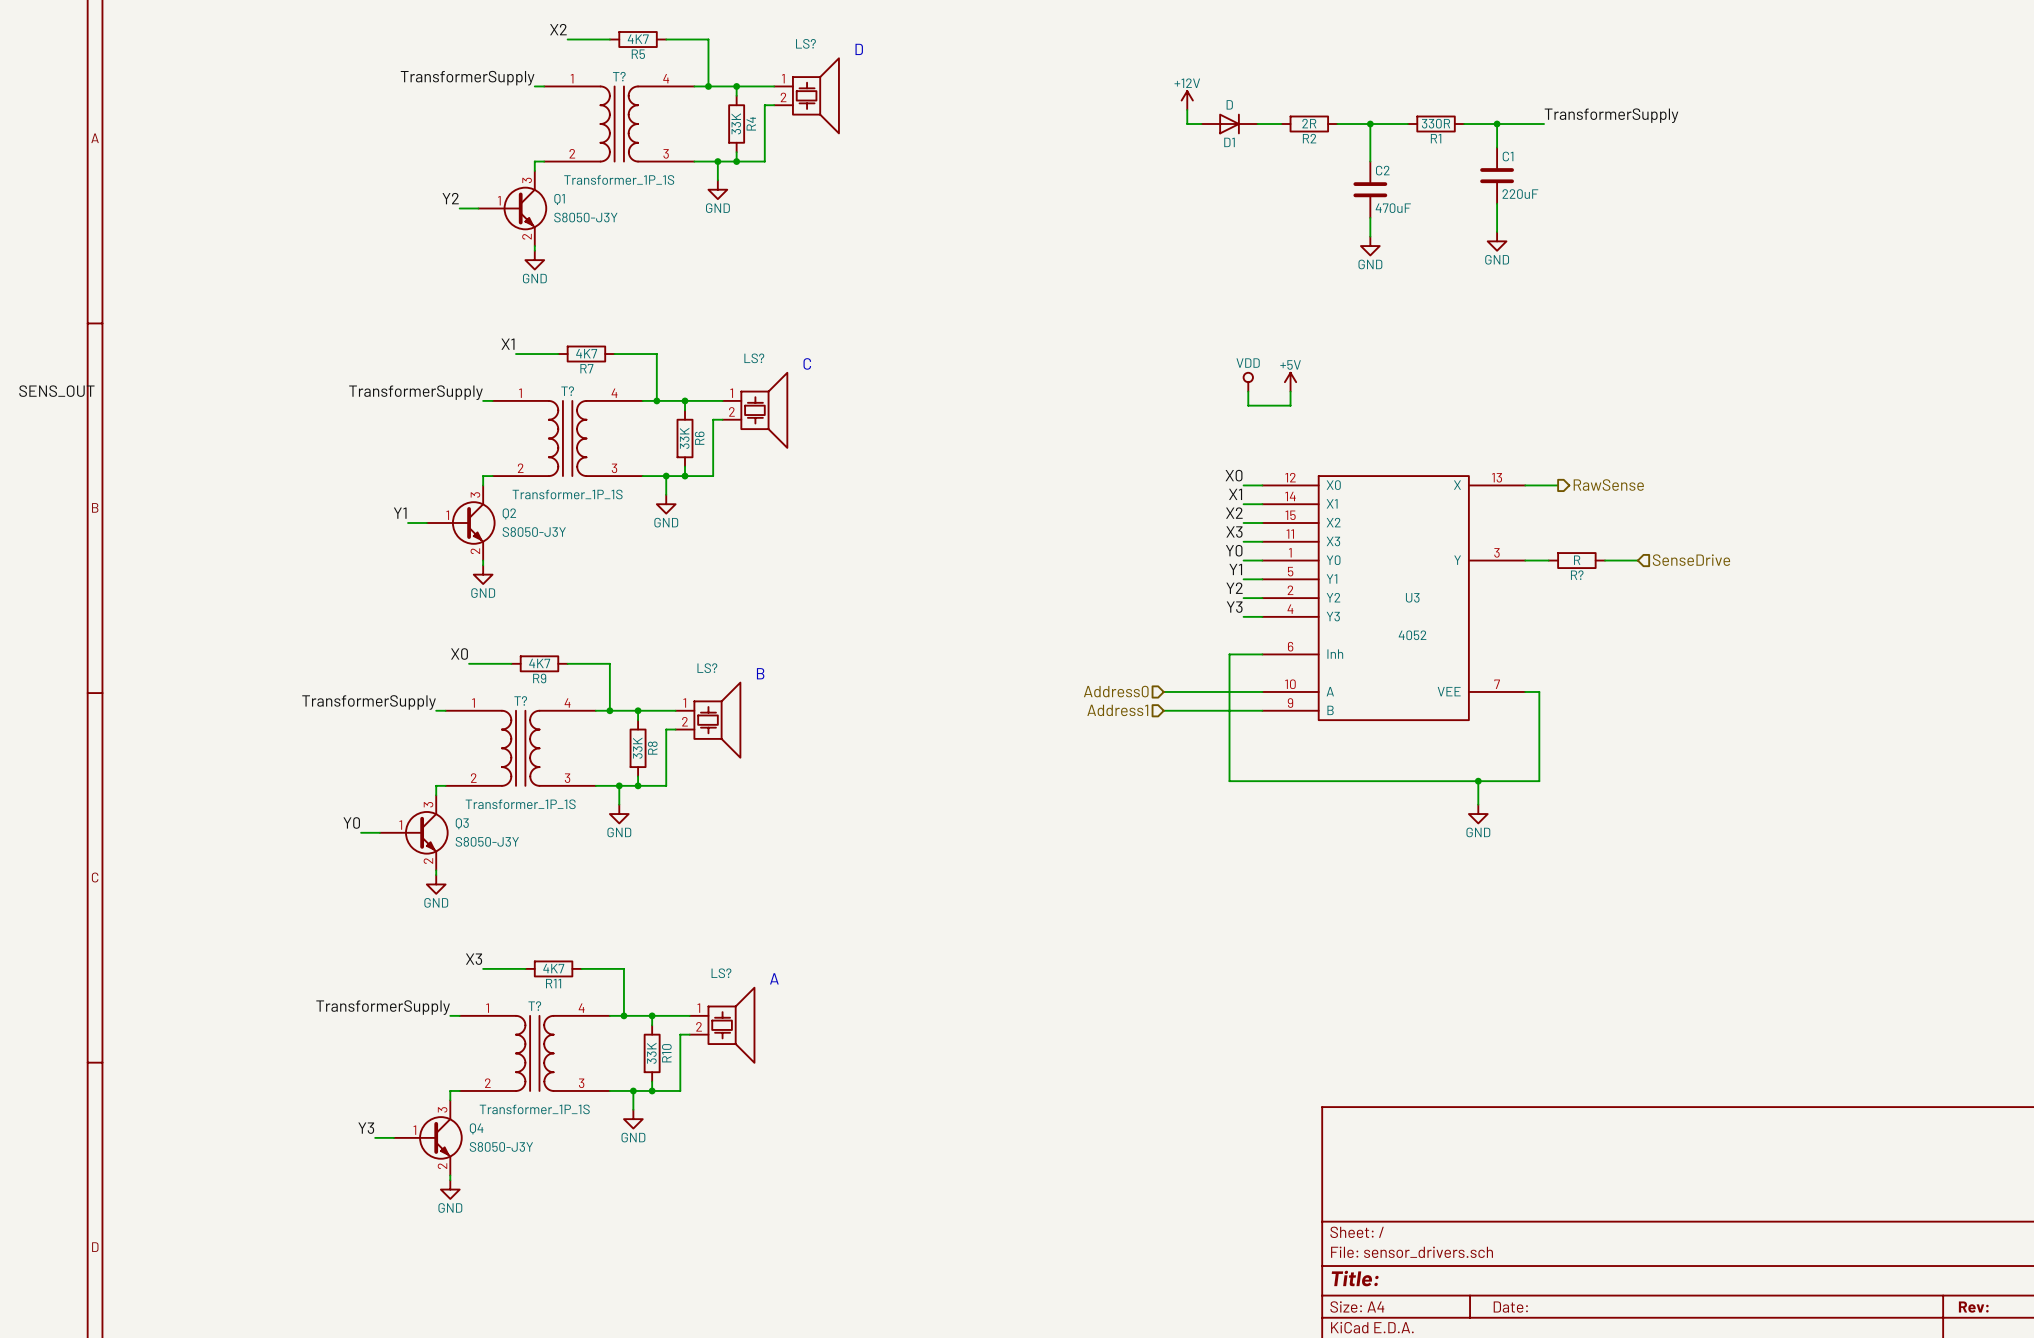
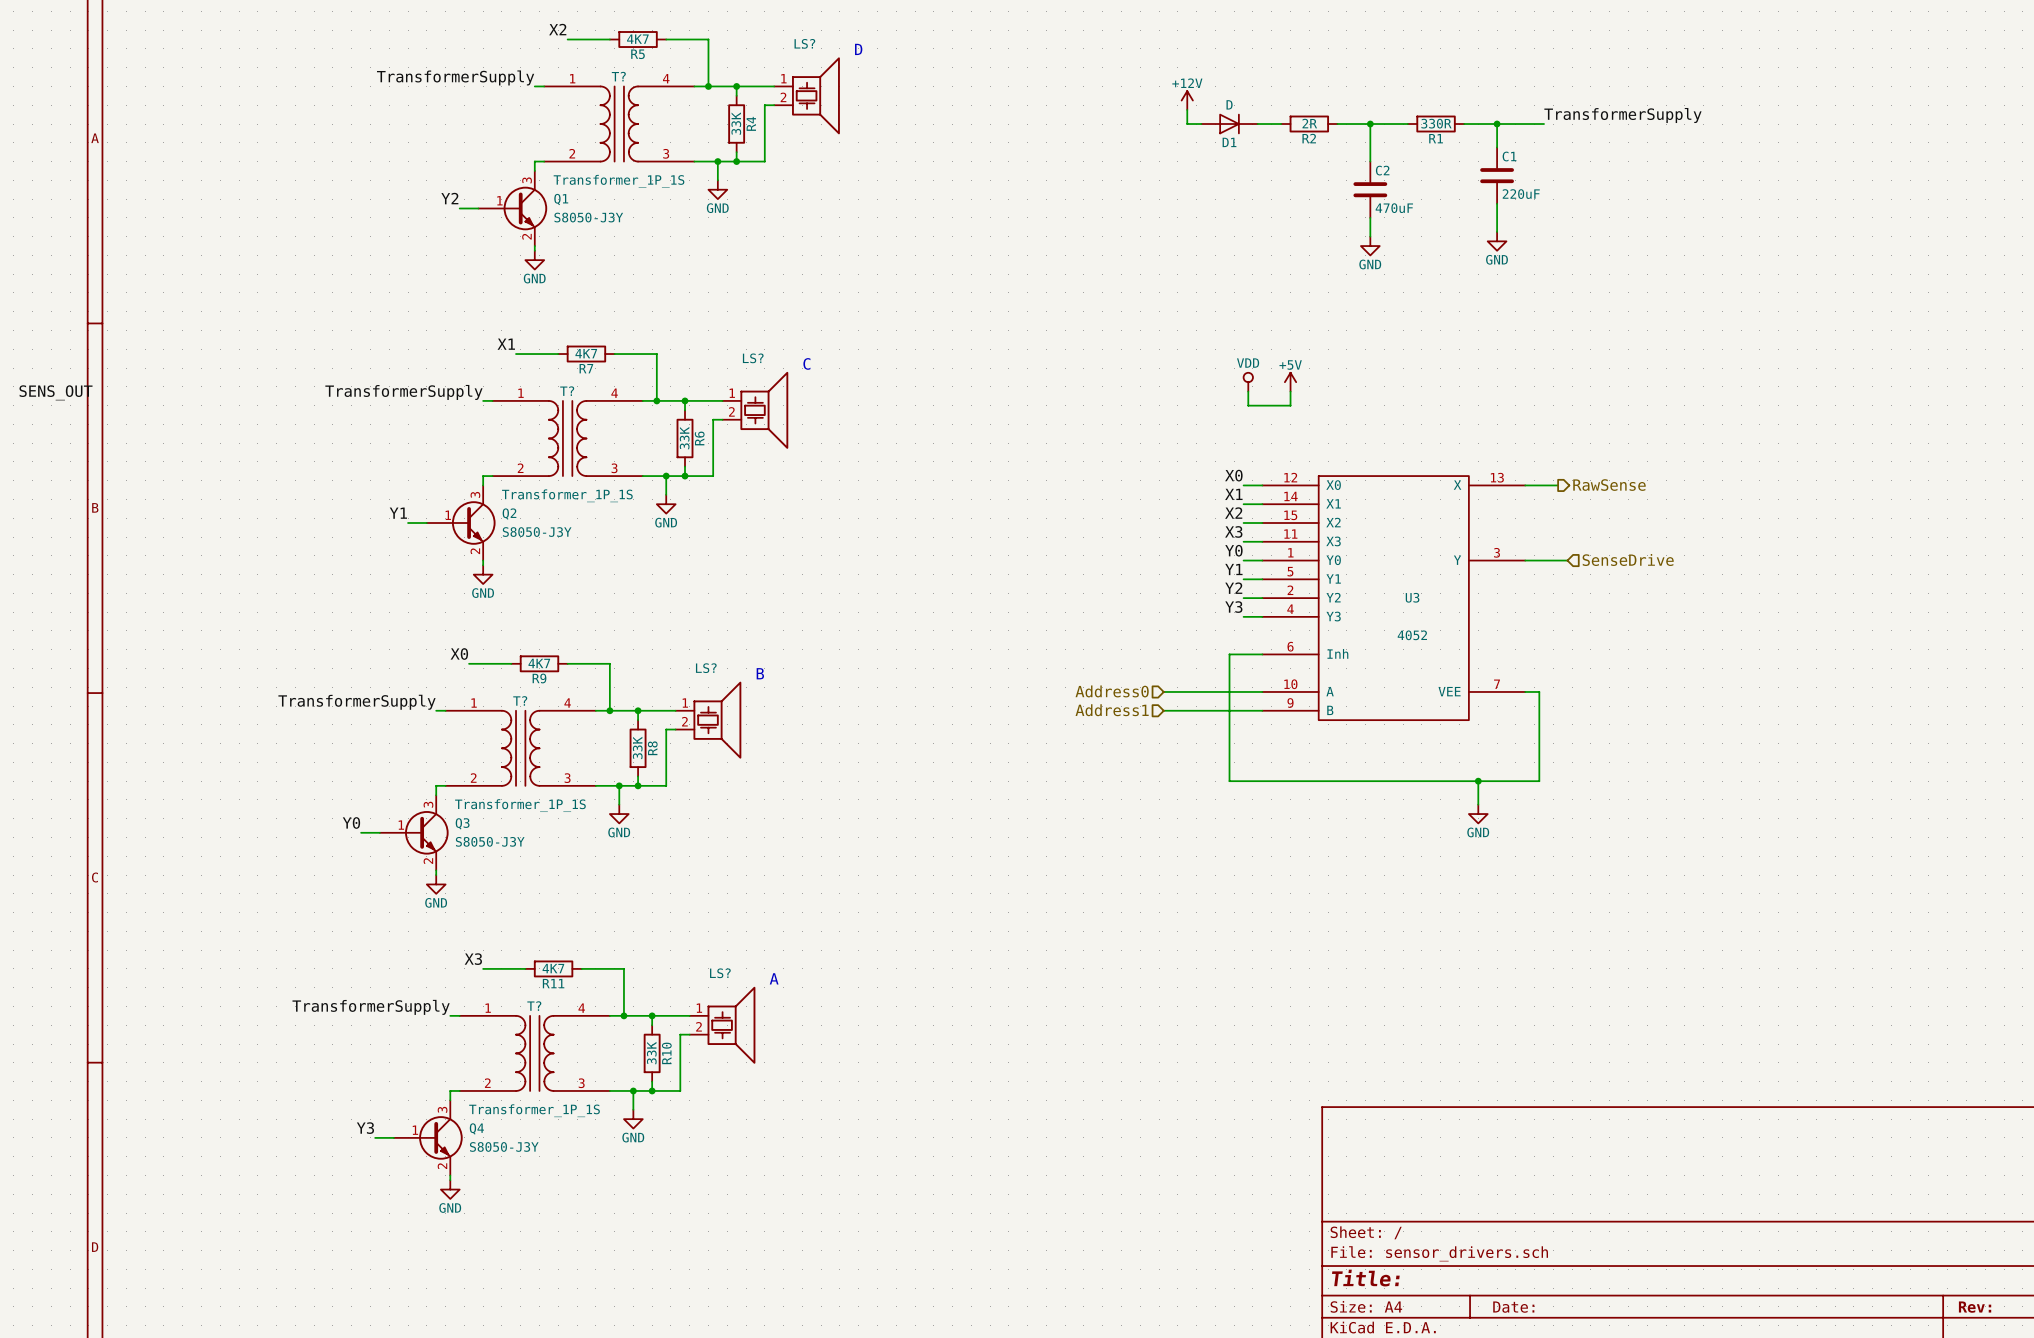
R?: R (1576, 560) -> none
wire: (1605, 560) (1637, 560) -> none
hierarchical label position: SenseDrive (1691, 560) -> SenseDrive (1628, 560)

